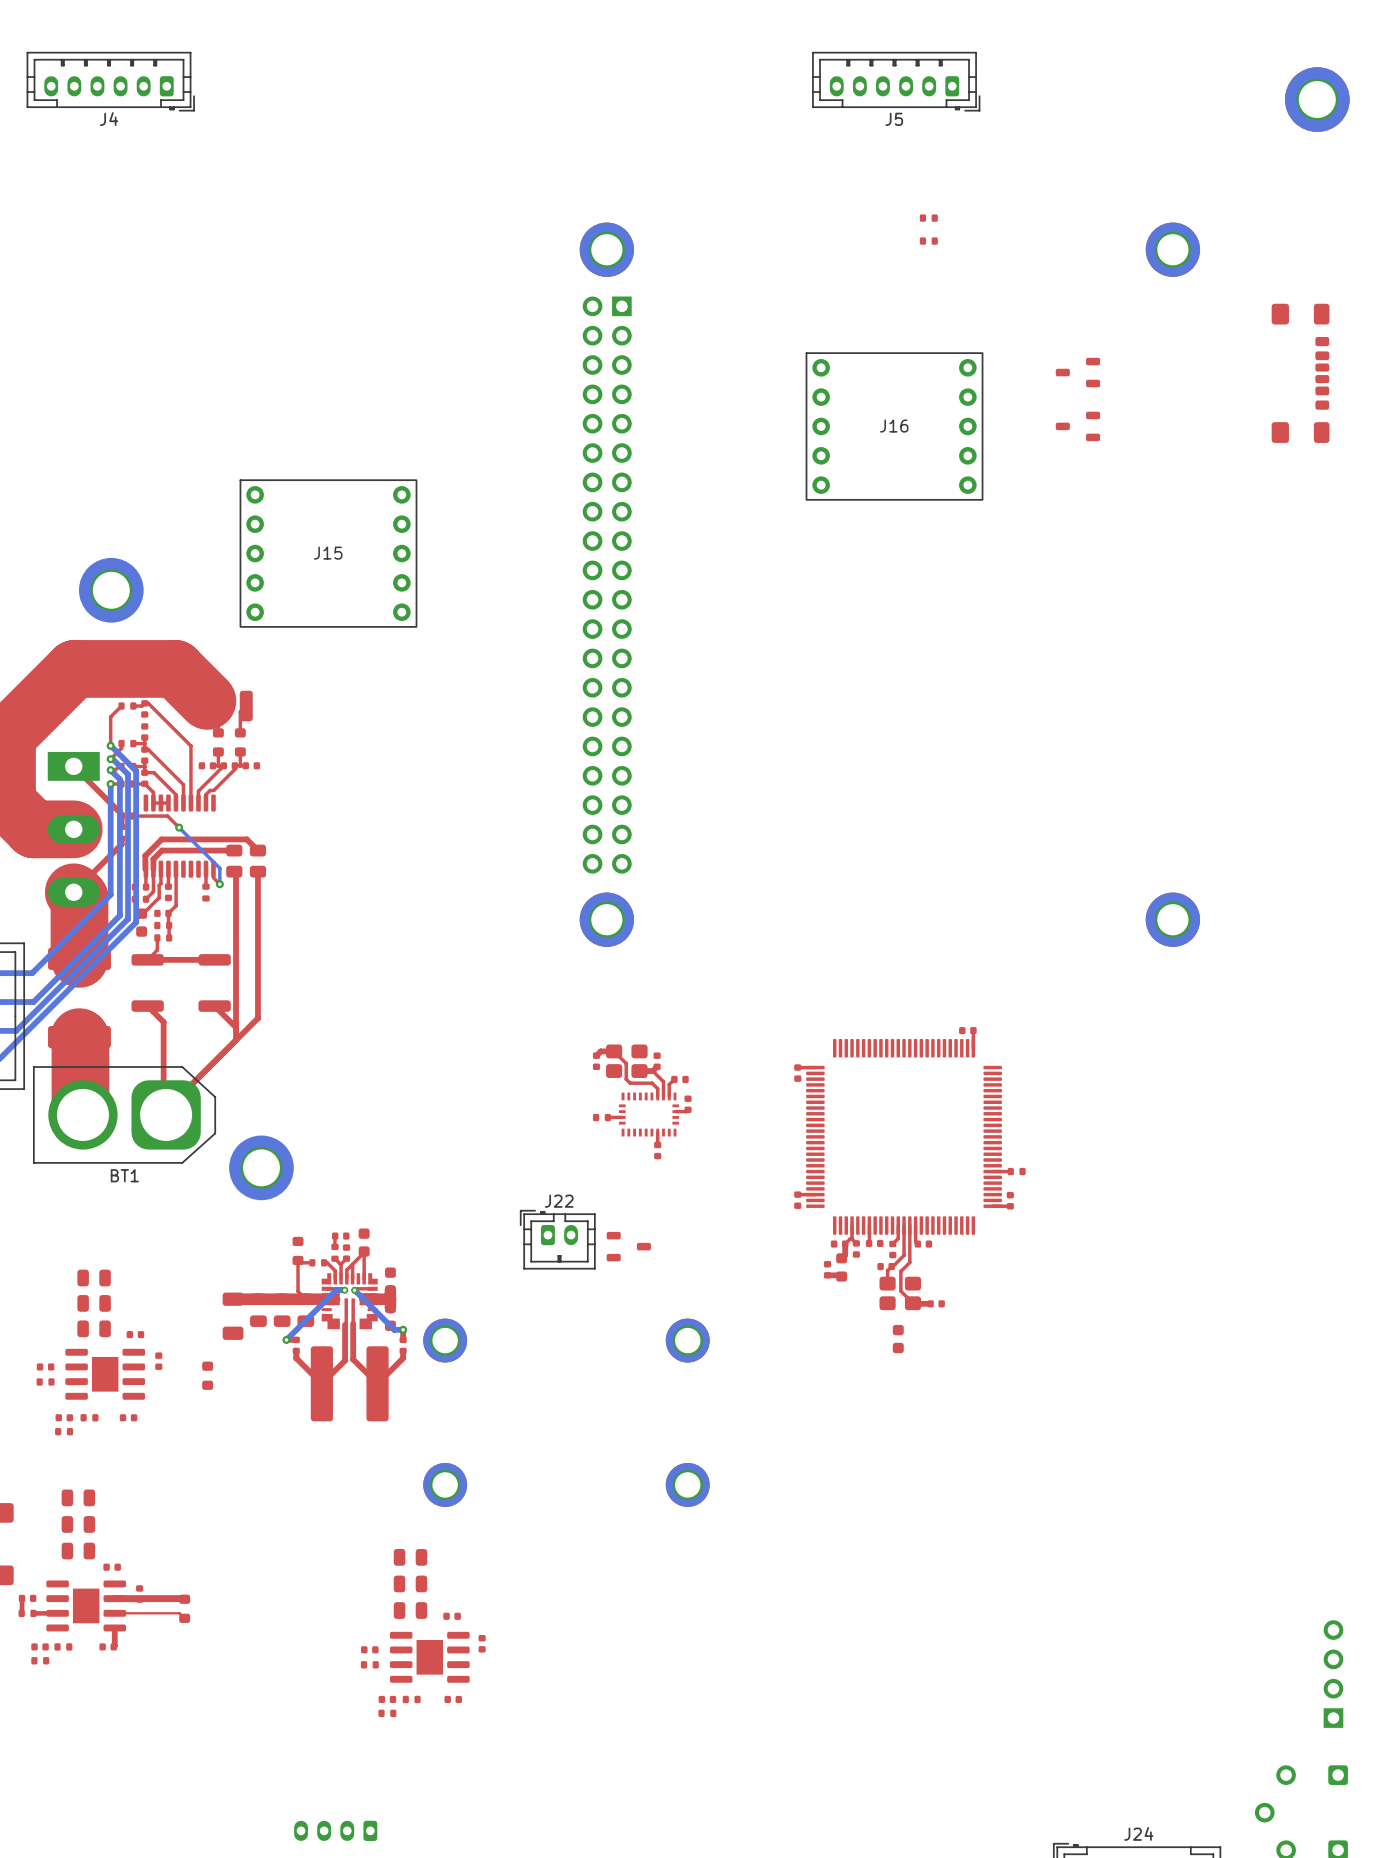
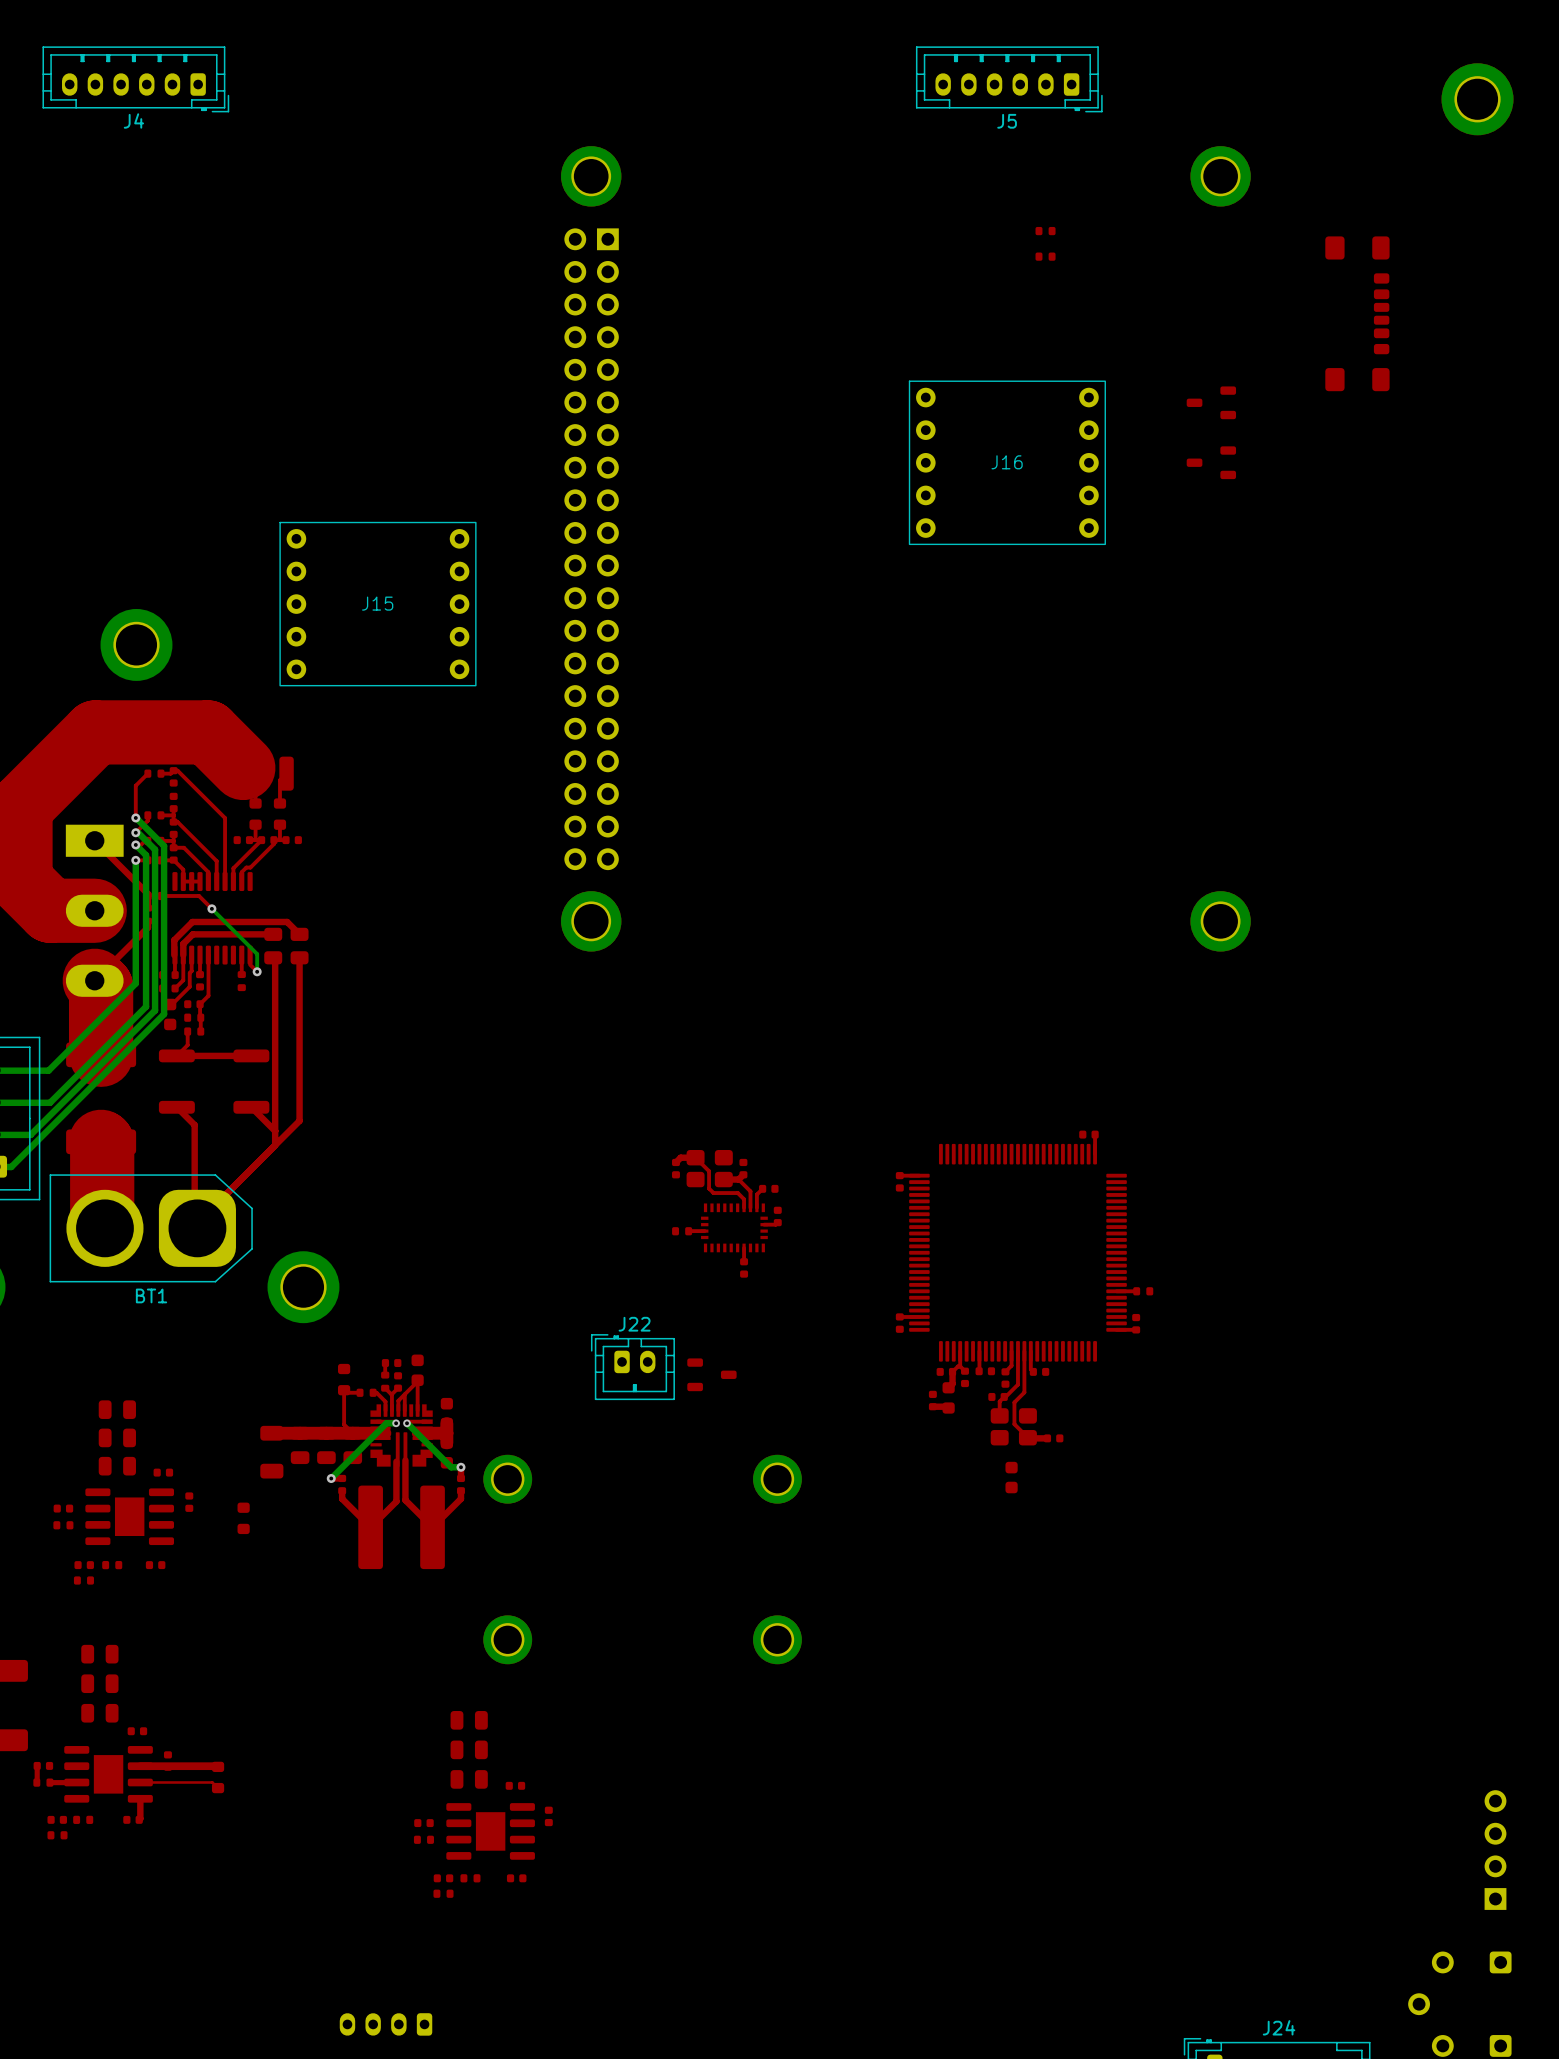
part position: (606, 249) -> (591, 176)
part position: (1172, 249) -> (1220, 176)
part position: (1300, 373) -> (1357, 313)
part position: (607, 585) -> (591, 549)
part position: (606, 919) -> (591, 921)
part position: (1172, 919) -> (1220, 921)

